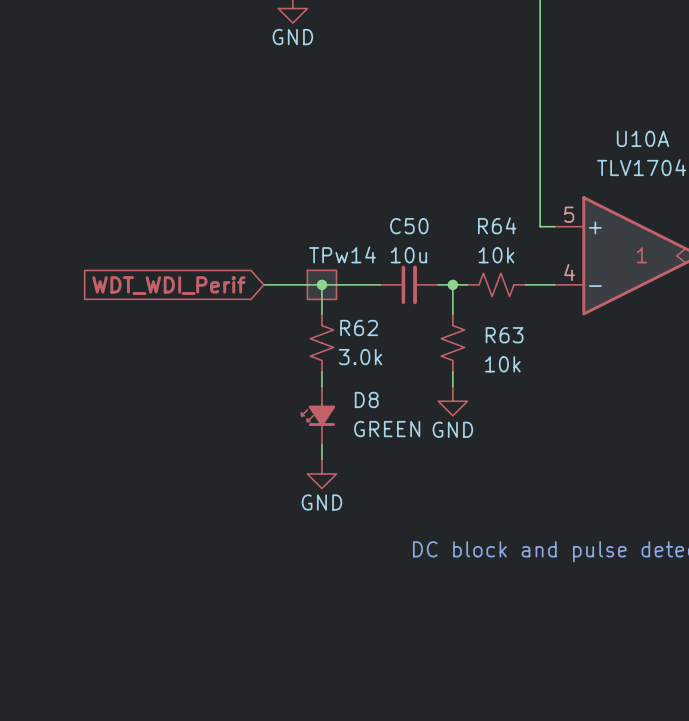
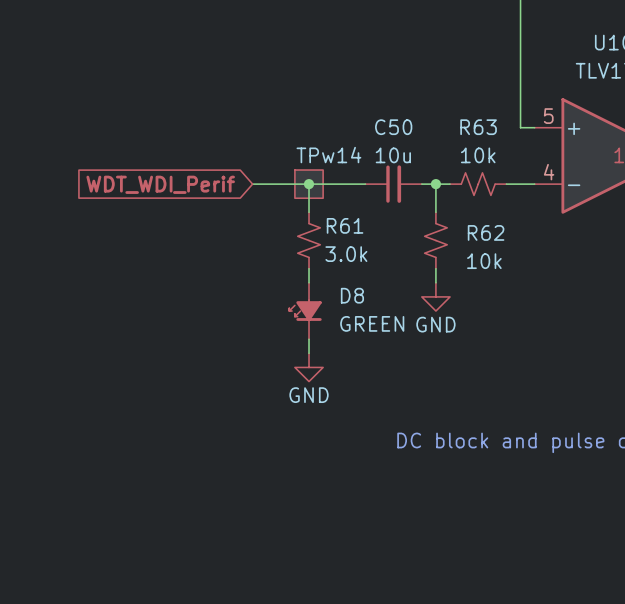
R64 name: R64 (497, 225) -> R63 (478, 127)
R62 name: R62 (359, 327) -> R61 (345, 225)
R63 name: R63 (504, 335) -> R62 (486, 232)

